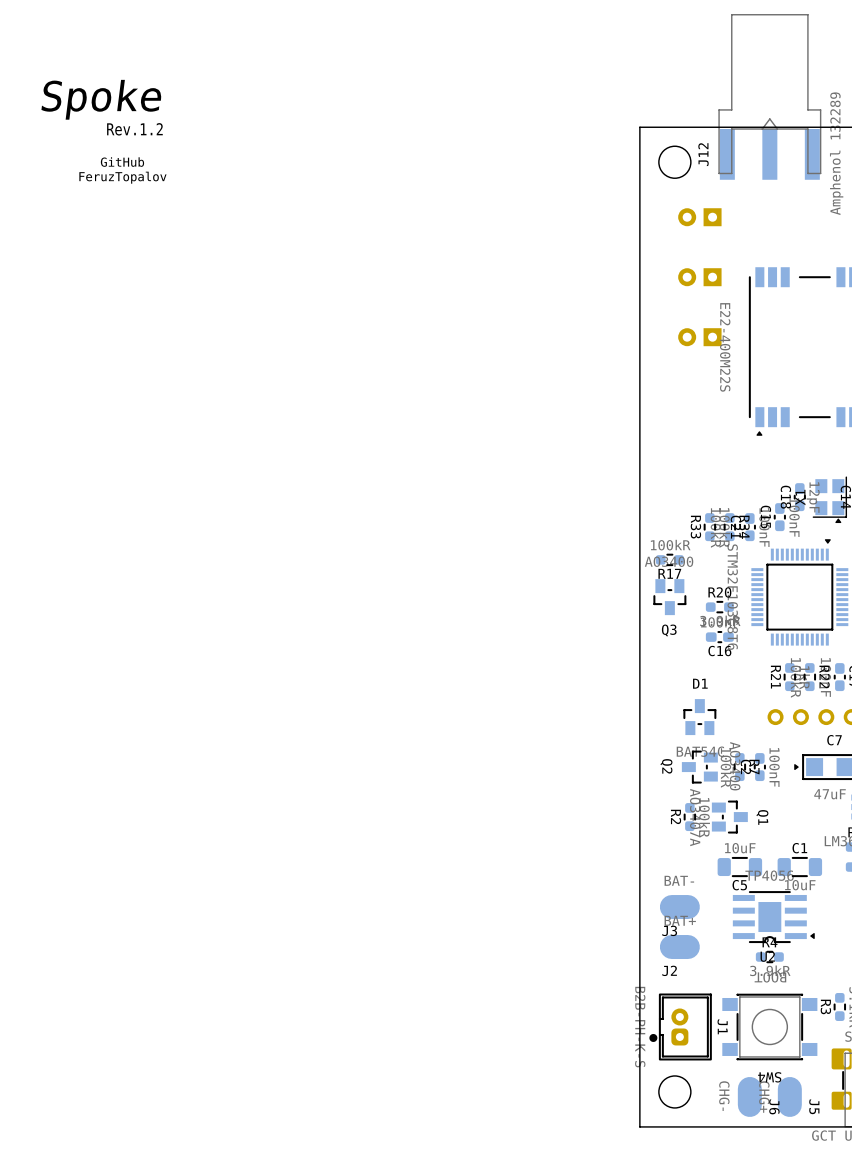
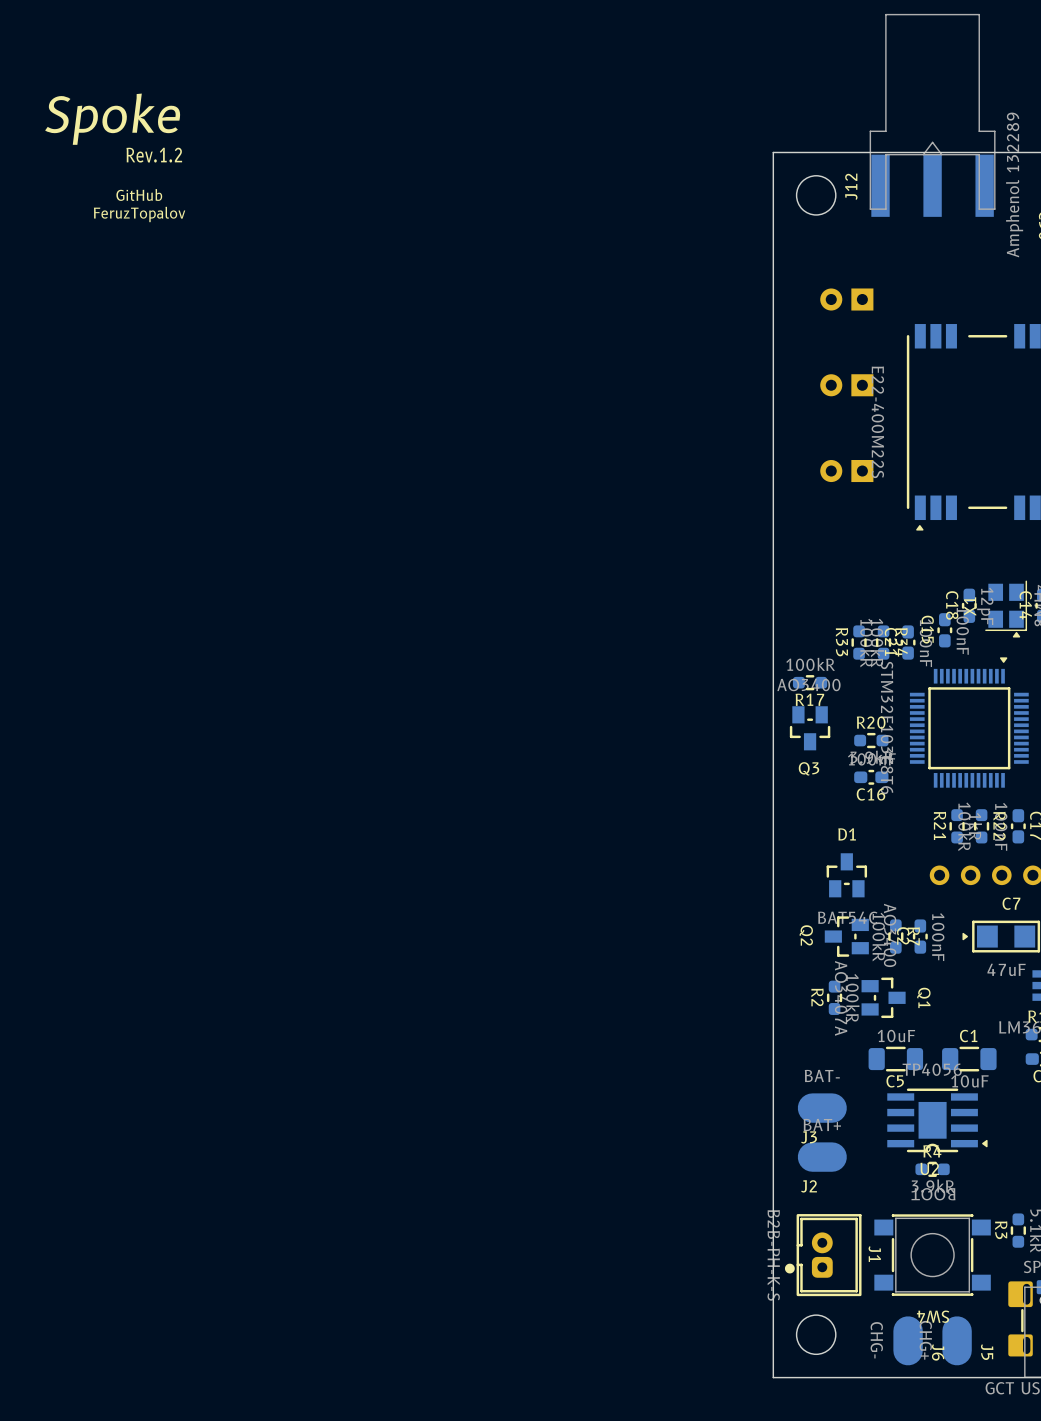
part: (699, 217) -> none
part: none -> (846, 299)
part: (699, 277) -> none
part: none -> (846, 385)
part: (699, 337) -> none
part: none -> (846, 471)

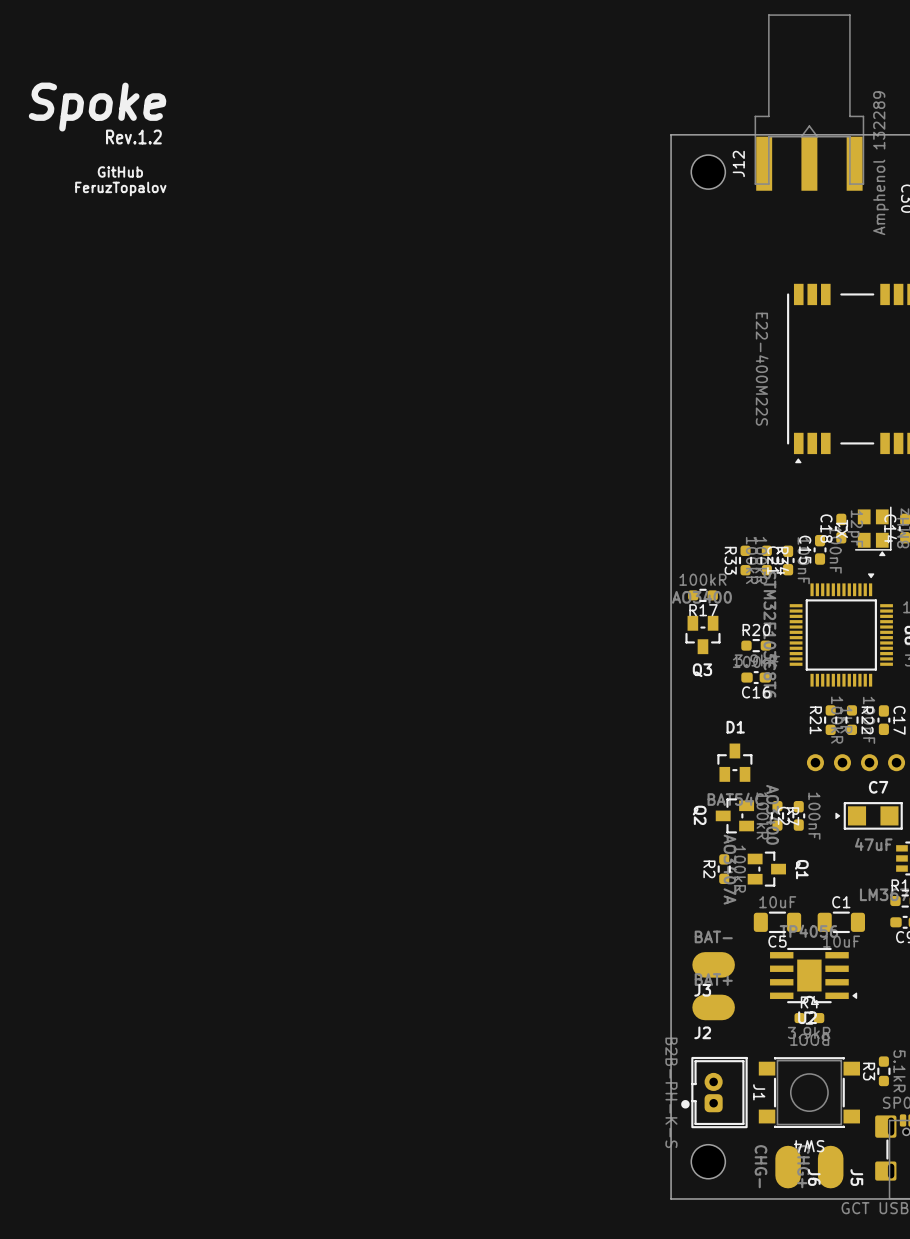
part: (846, 299) -> none
part: (846, 385) -> none
part: (846, 471) -> none

